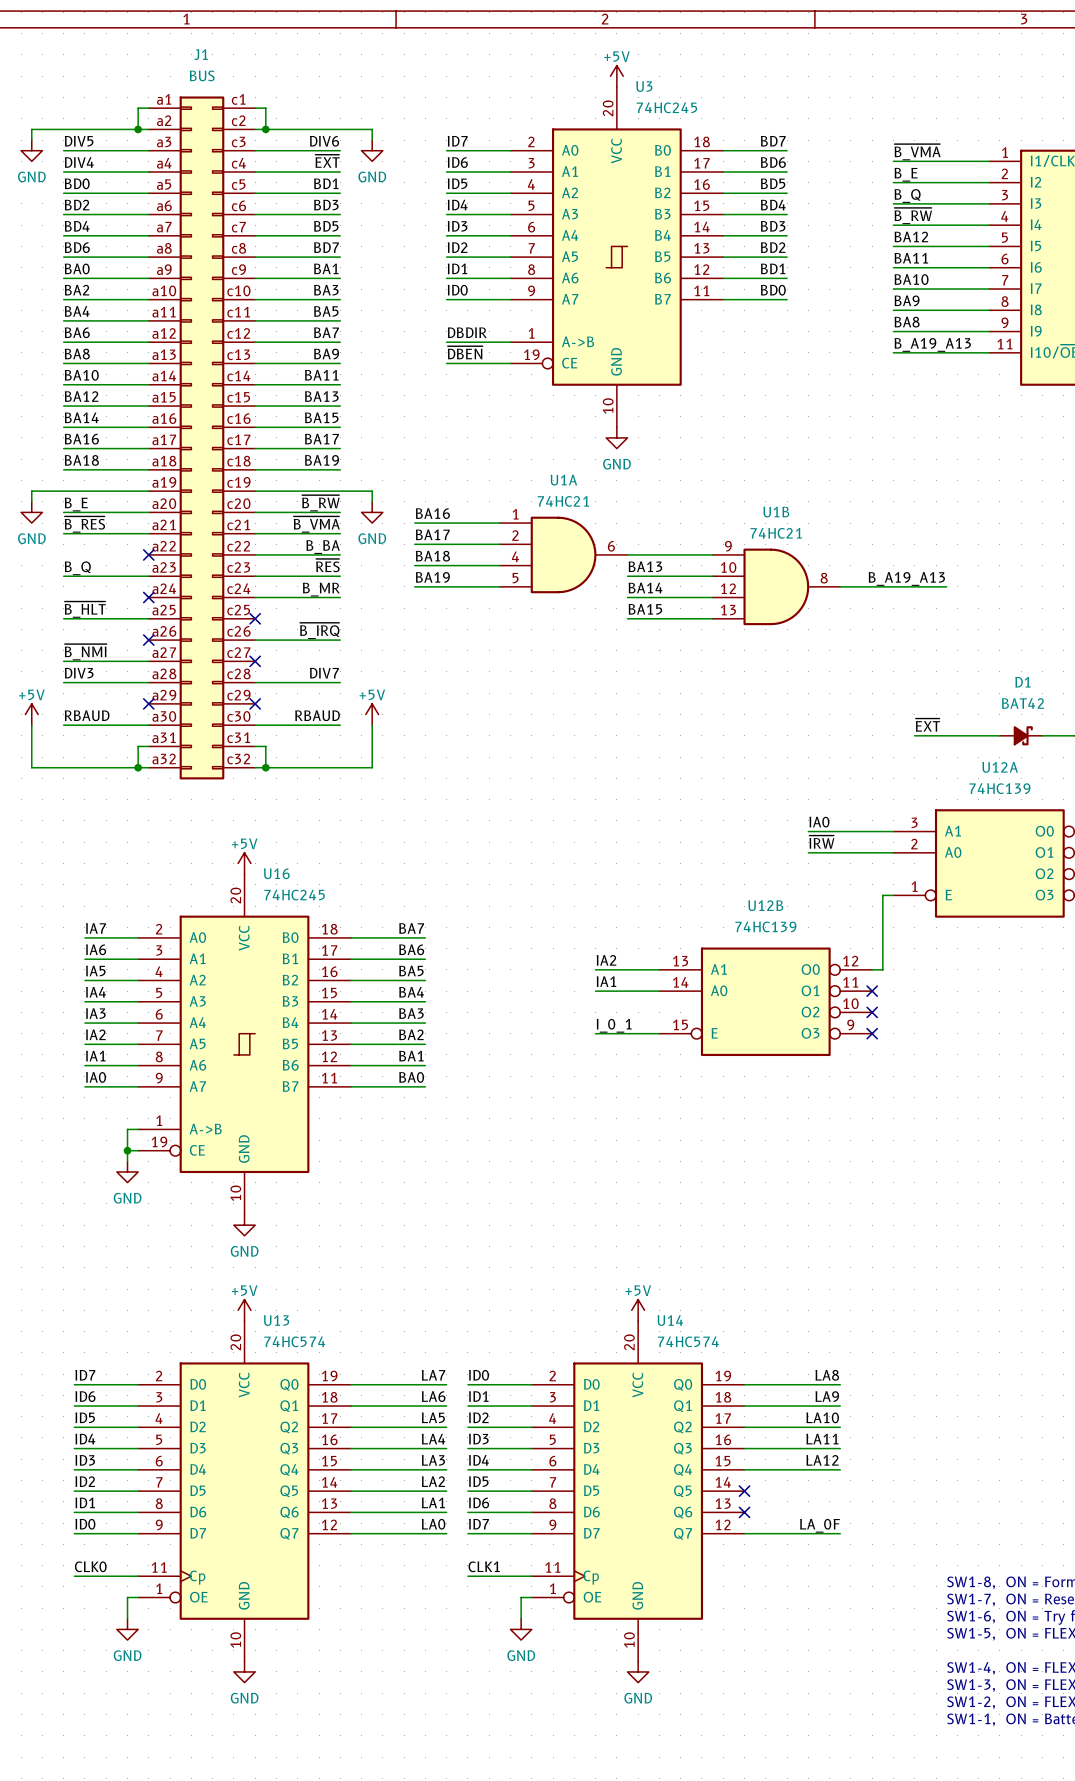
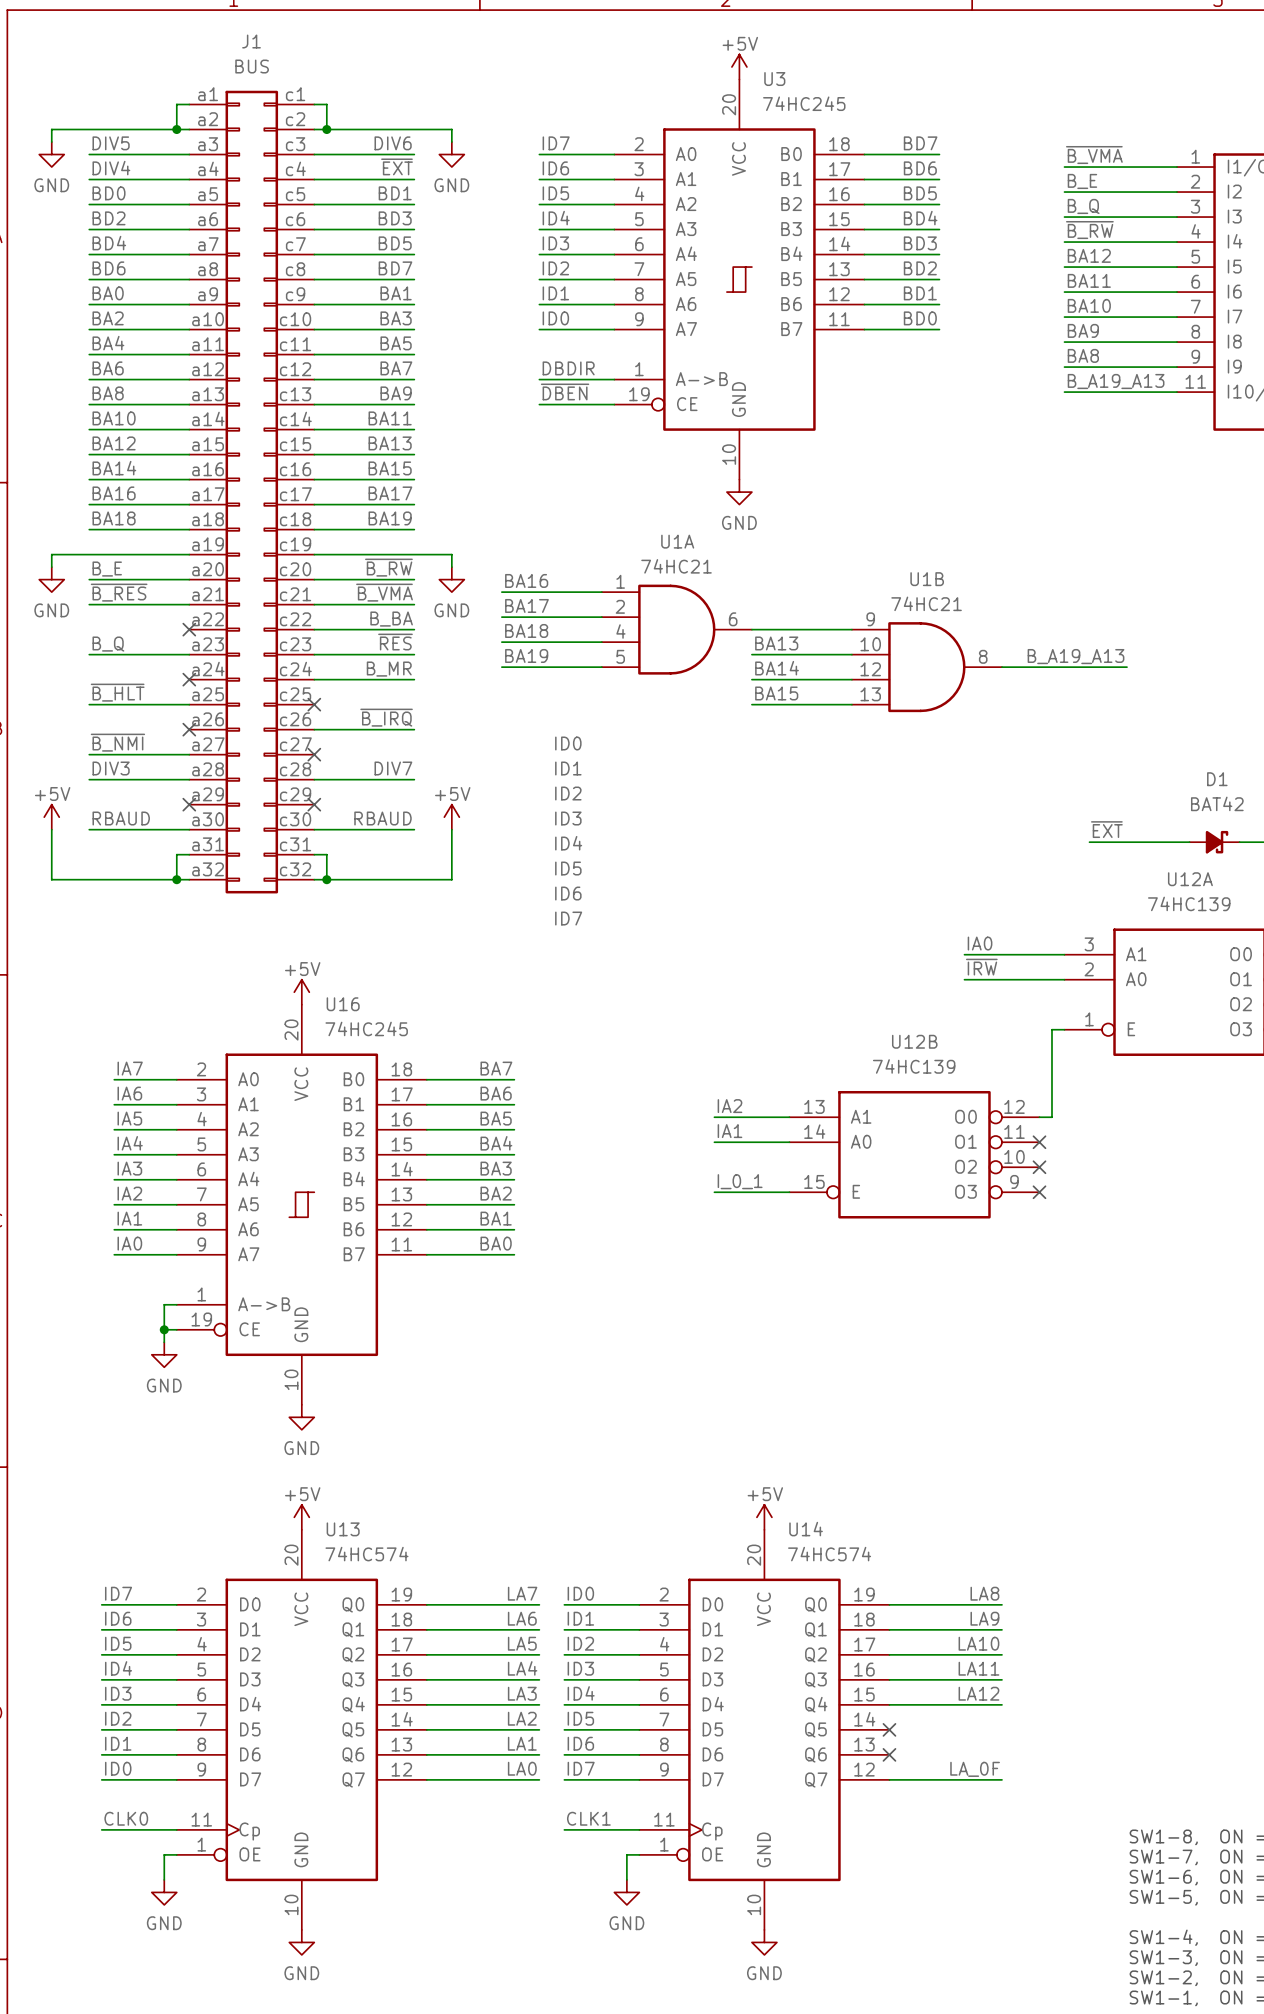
label: none -> ID0 (568, 743)
label: none -> ID1 (568, 768)
label: none -> ID2 (568, 793)
label: none -> ID3 (568, 818)
label: none -> ID4 (568, 843)
label: none -> ID5 (568, 868)
label: none -> ID6 (568, 893)
label: none -> ID7 (568, 918)

